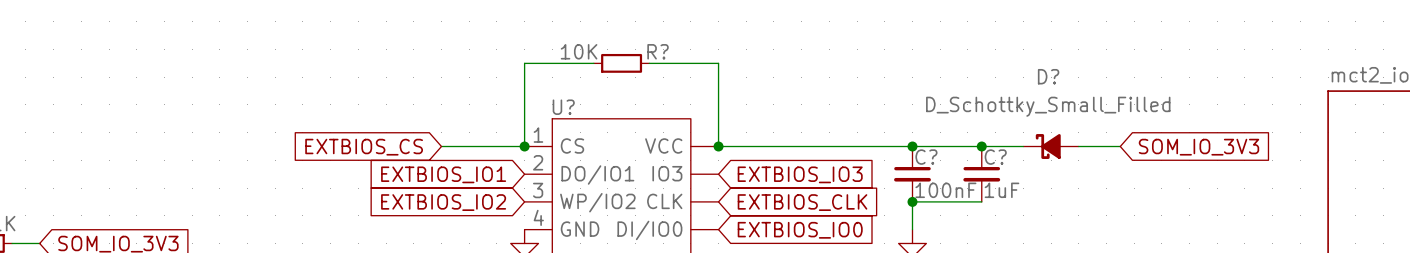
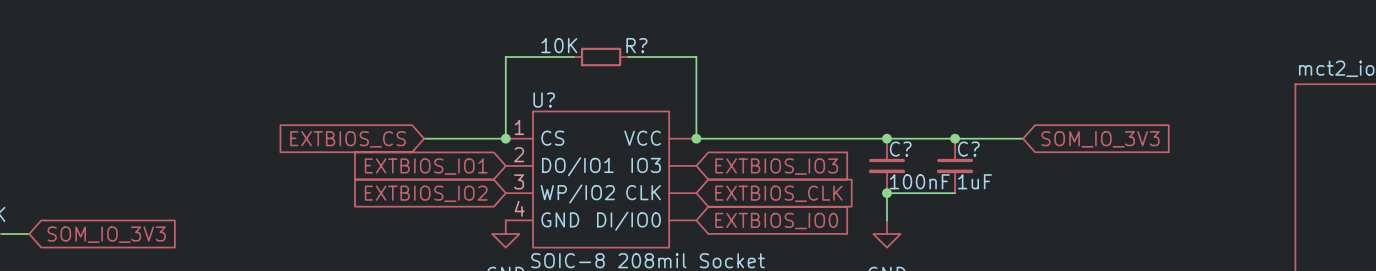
D?: D_Schottky_Small_Filled (1051, 146) -> none
wire: (1078, 146) (1120, 146) -> none
global label position: SOM_IO_3V3 (1198, 147) -> SOM_IO_3V3 (1100, 139)

